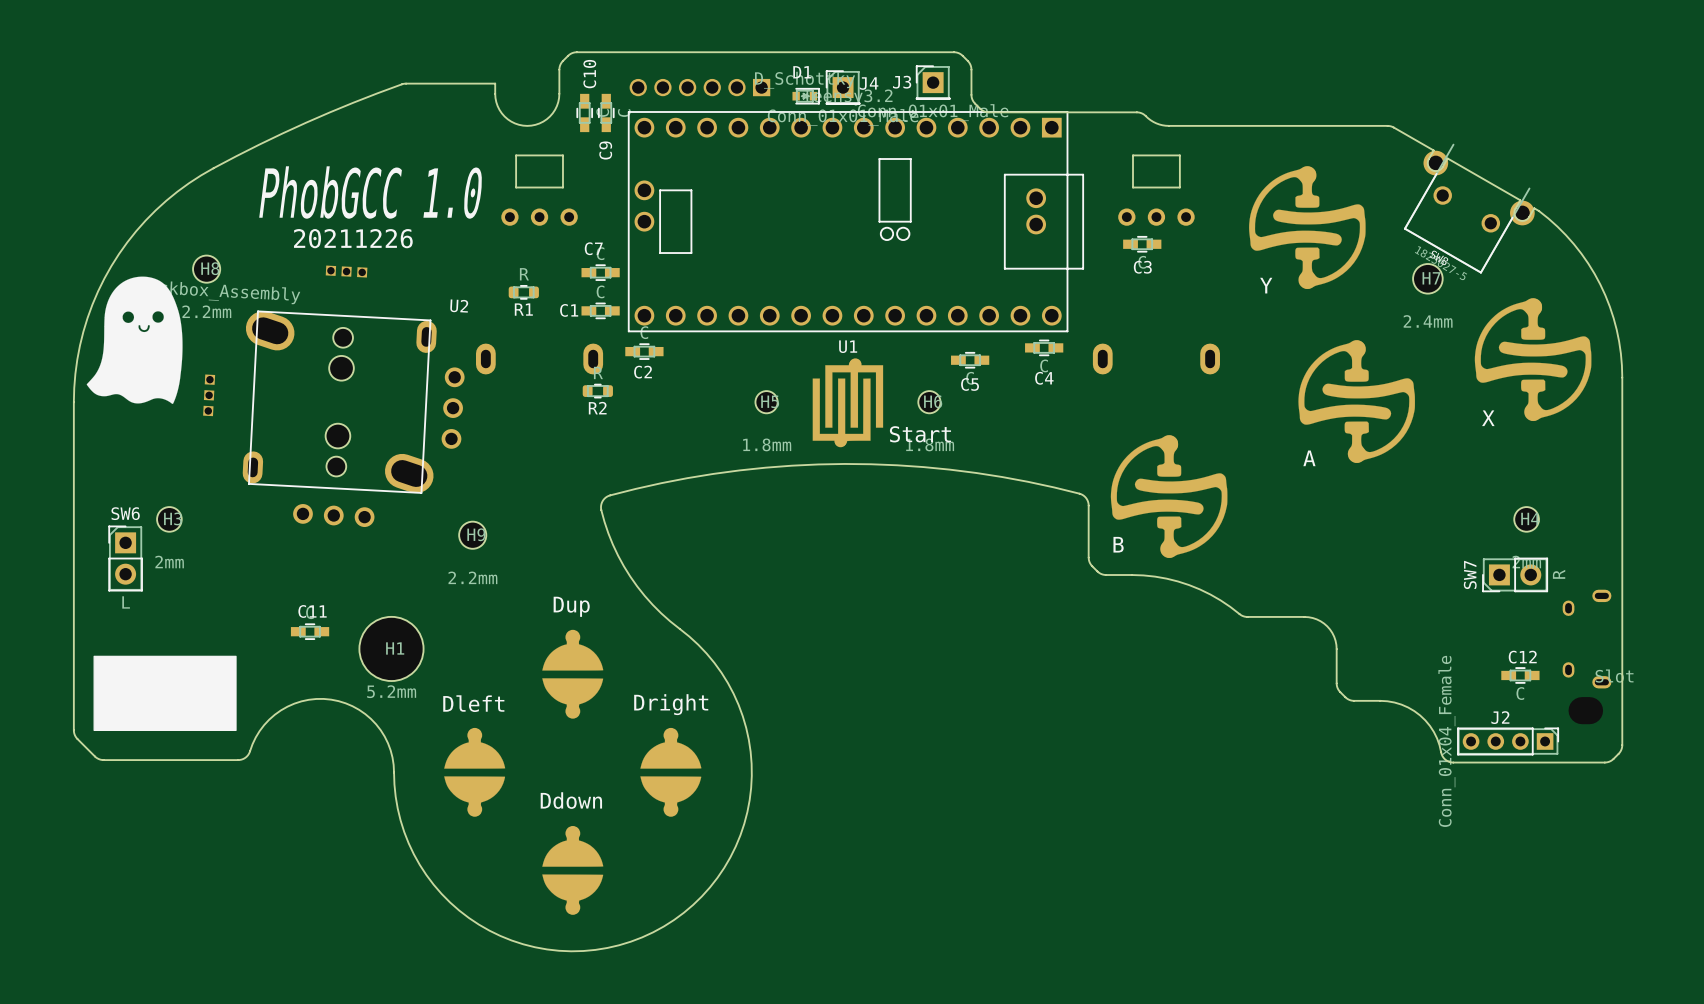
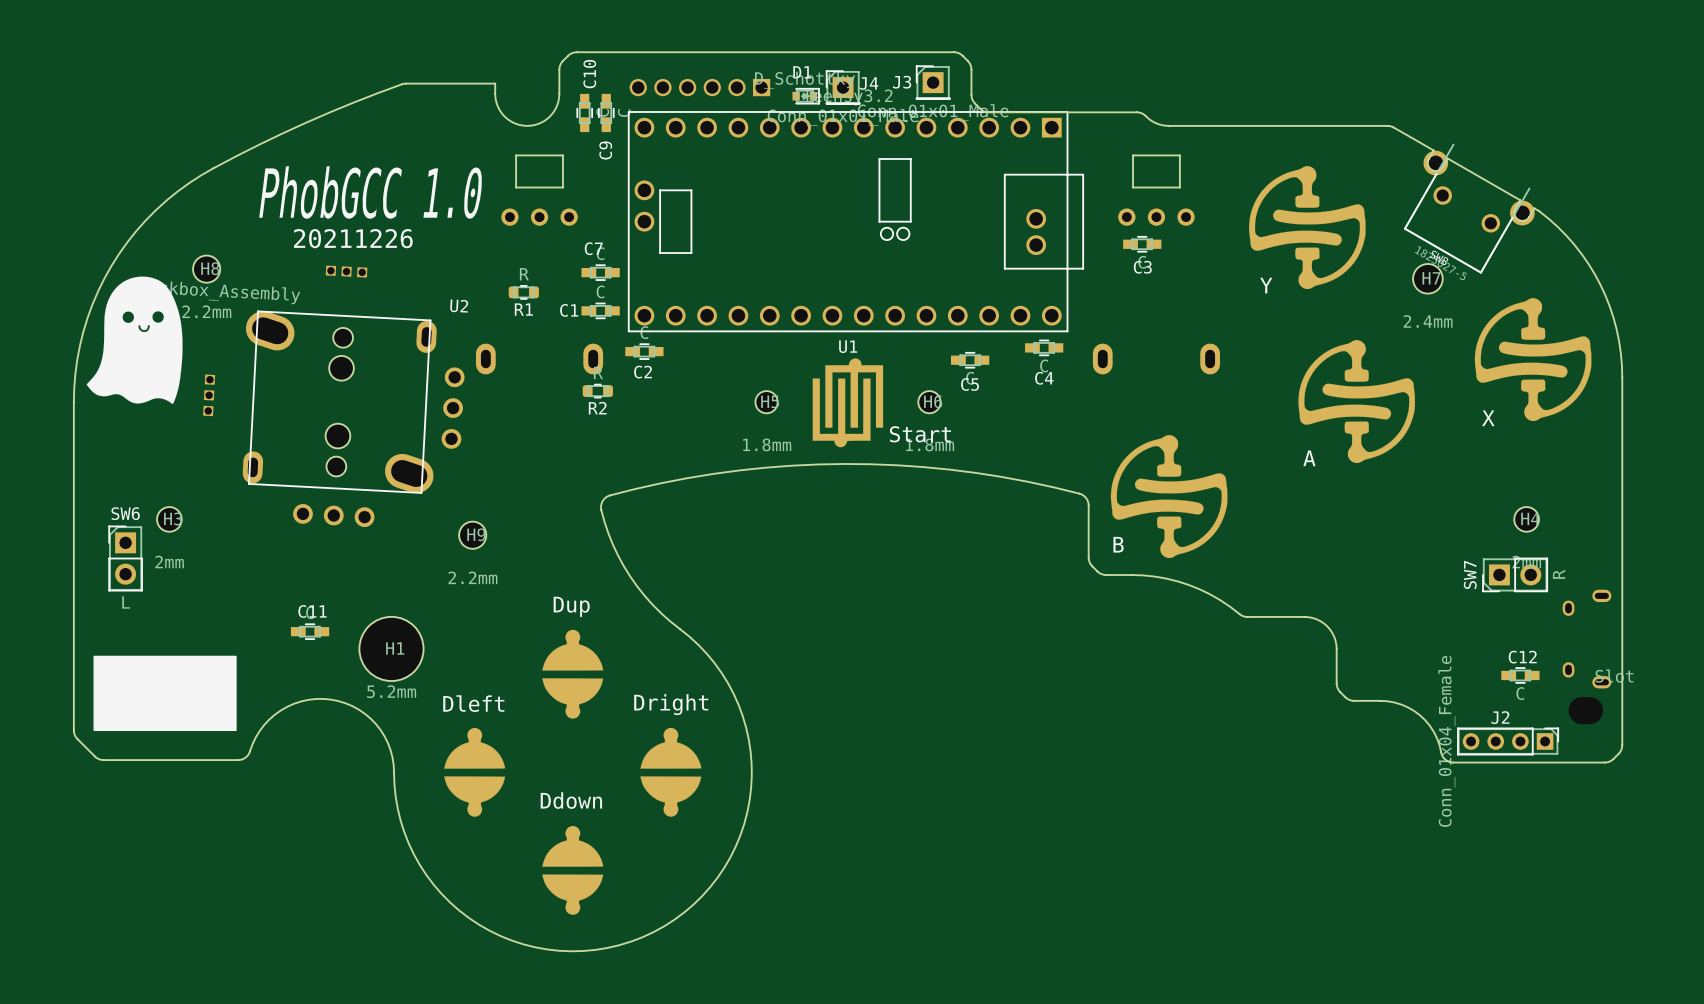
U1 footprint: [627, 111, 1085, 333] -> [627, 111, 1085, 333]

